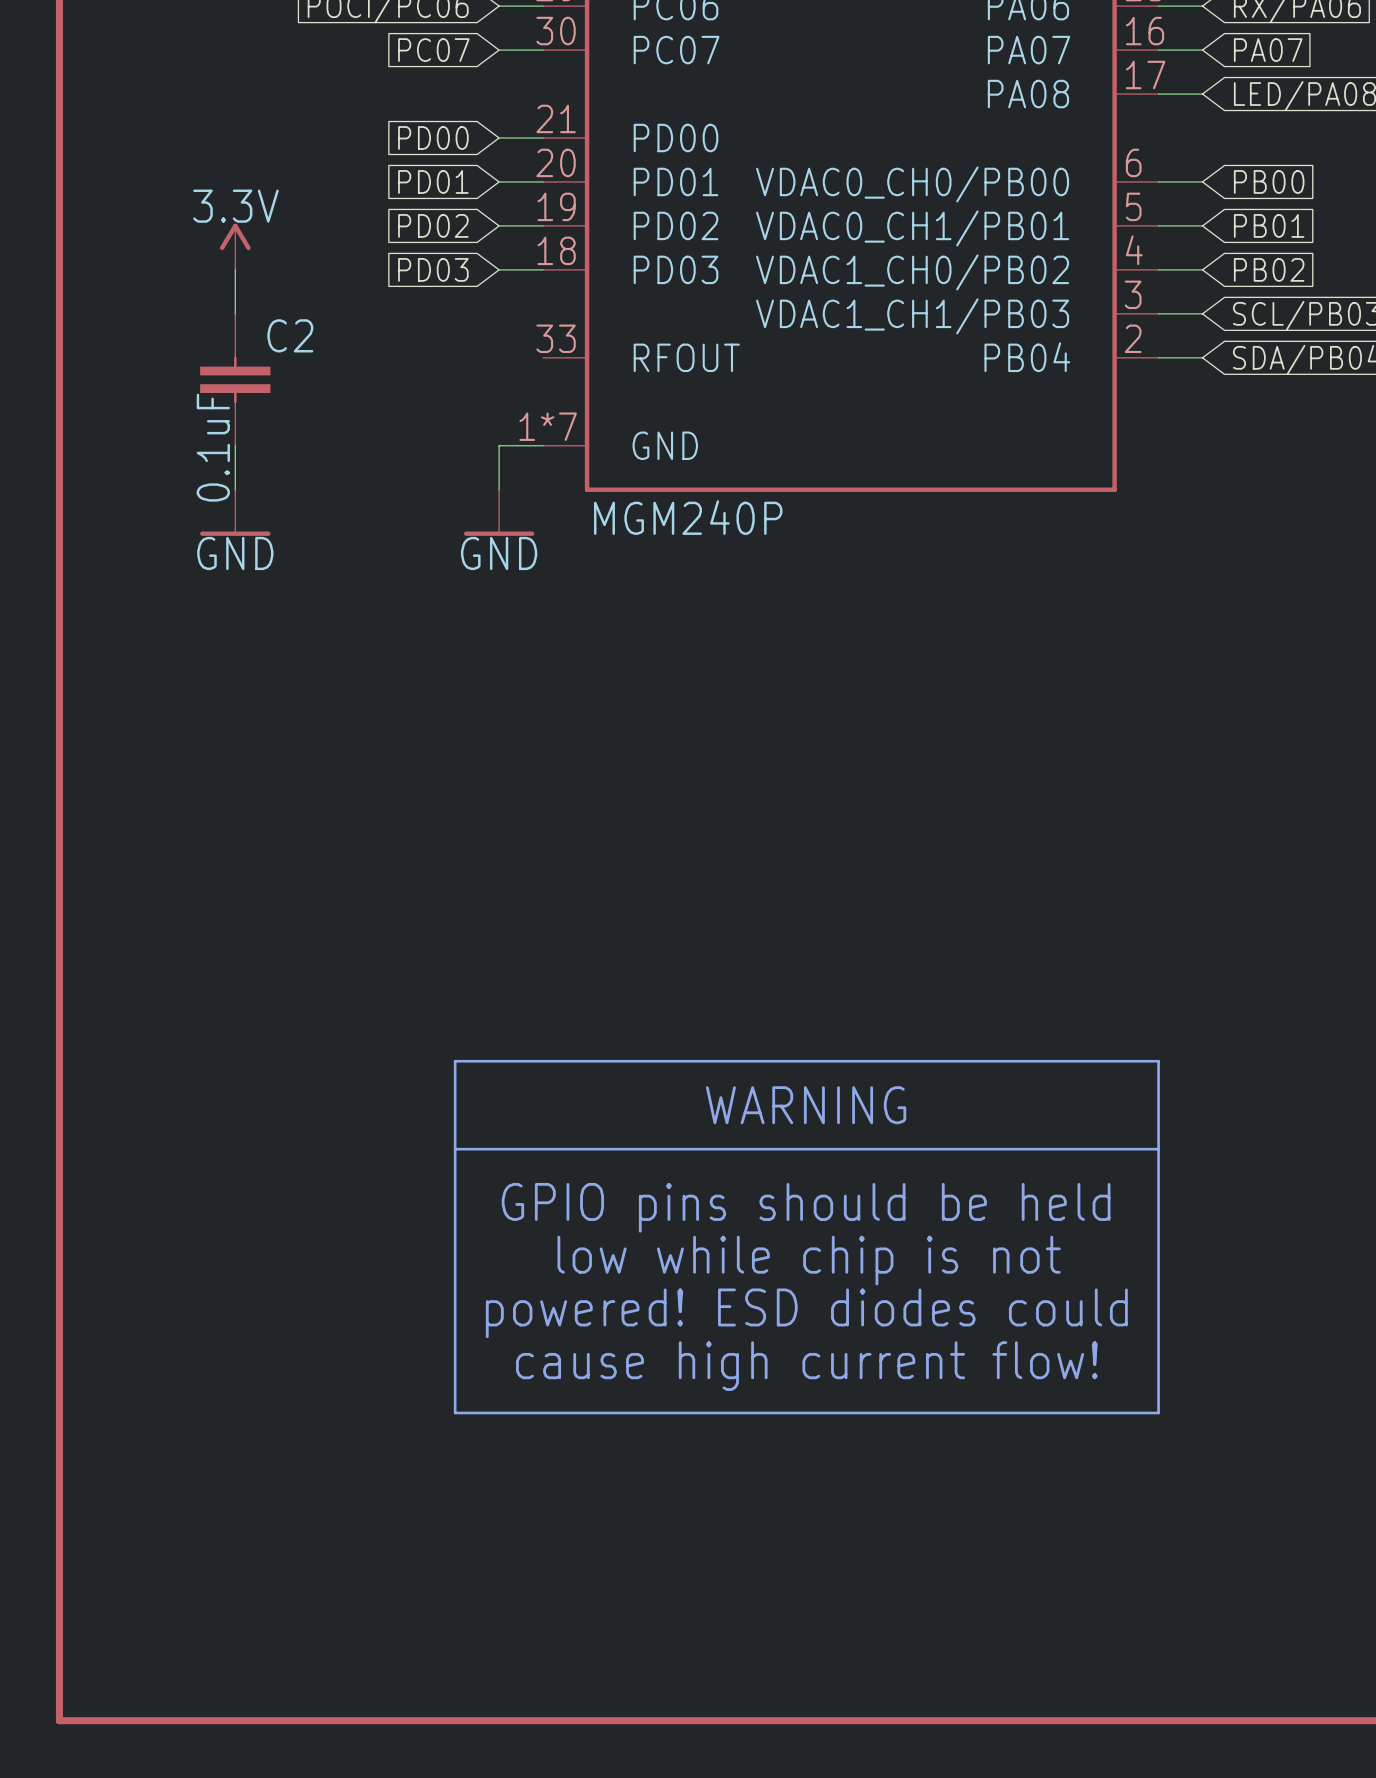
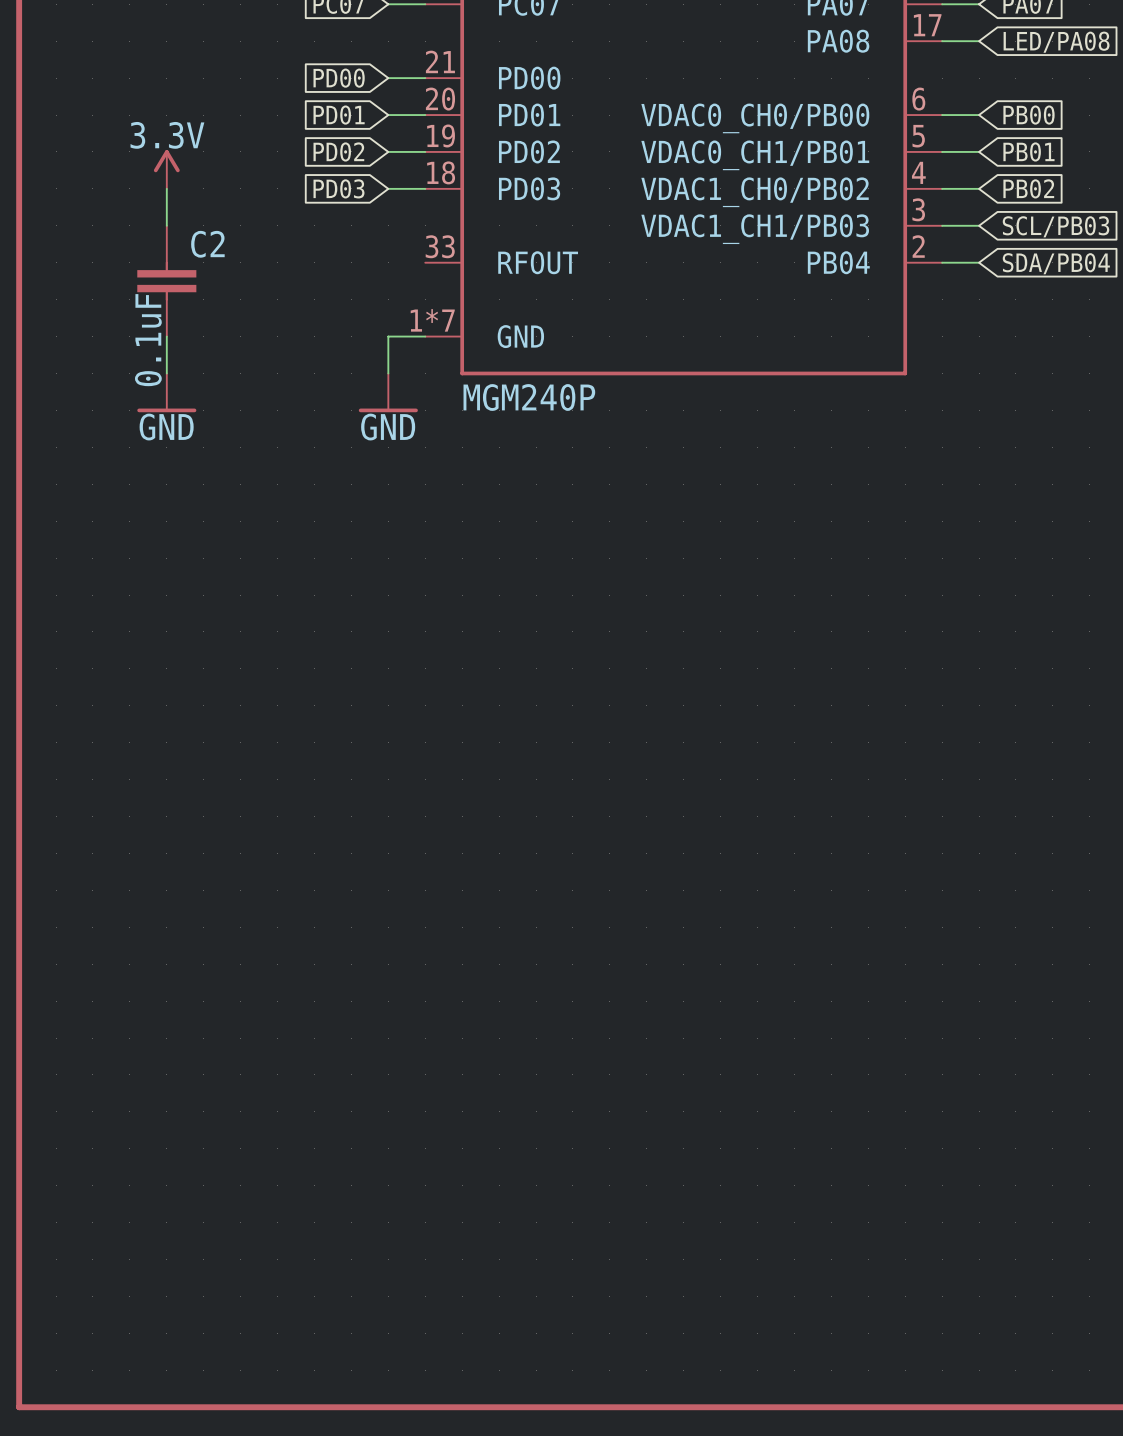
line: (455, 1061) (455, 1412) (1158, 1412) (1158, 1061) (455, 1061) -> none
text: WARNING (806, 1105) -> none
line: (455, 1149) (1158, 1149) -> none
text: GPIO pins should be held (806, 1207) -> none
text: low while chip is not (809, 1260) -> none
text: powered! ESD diodes could (806, 1313) -> none
text: cause high current flow! (806, 1366) -> none

